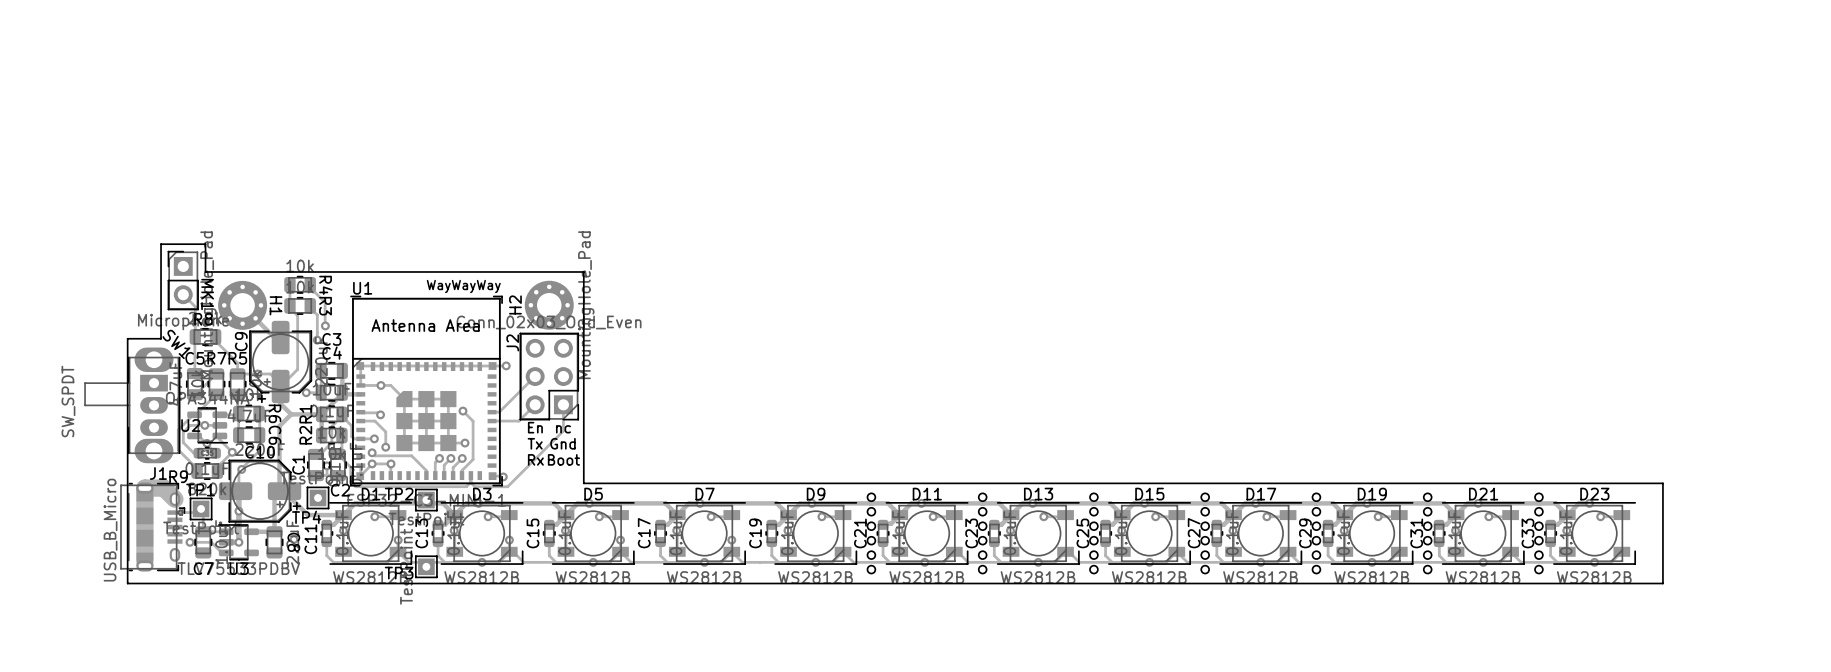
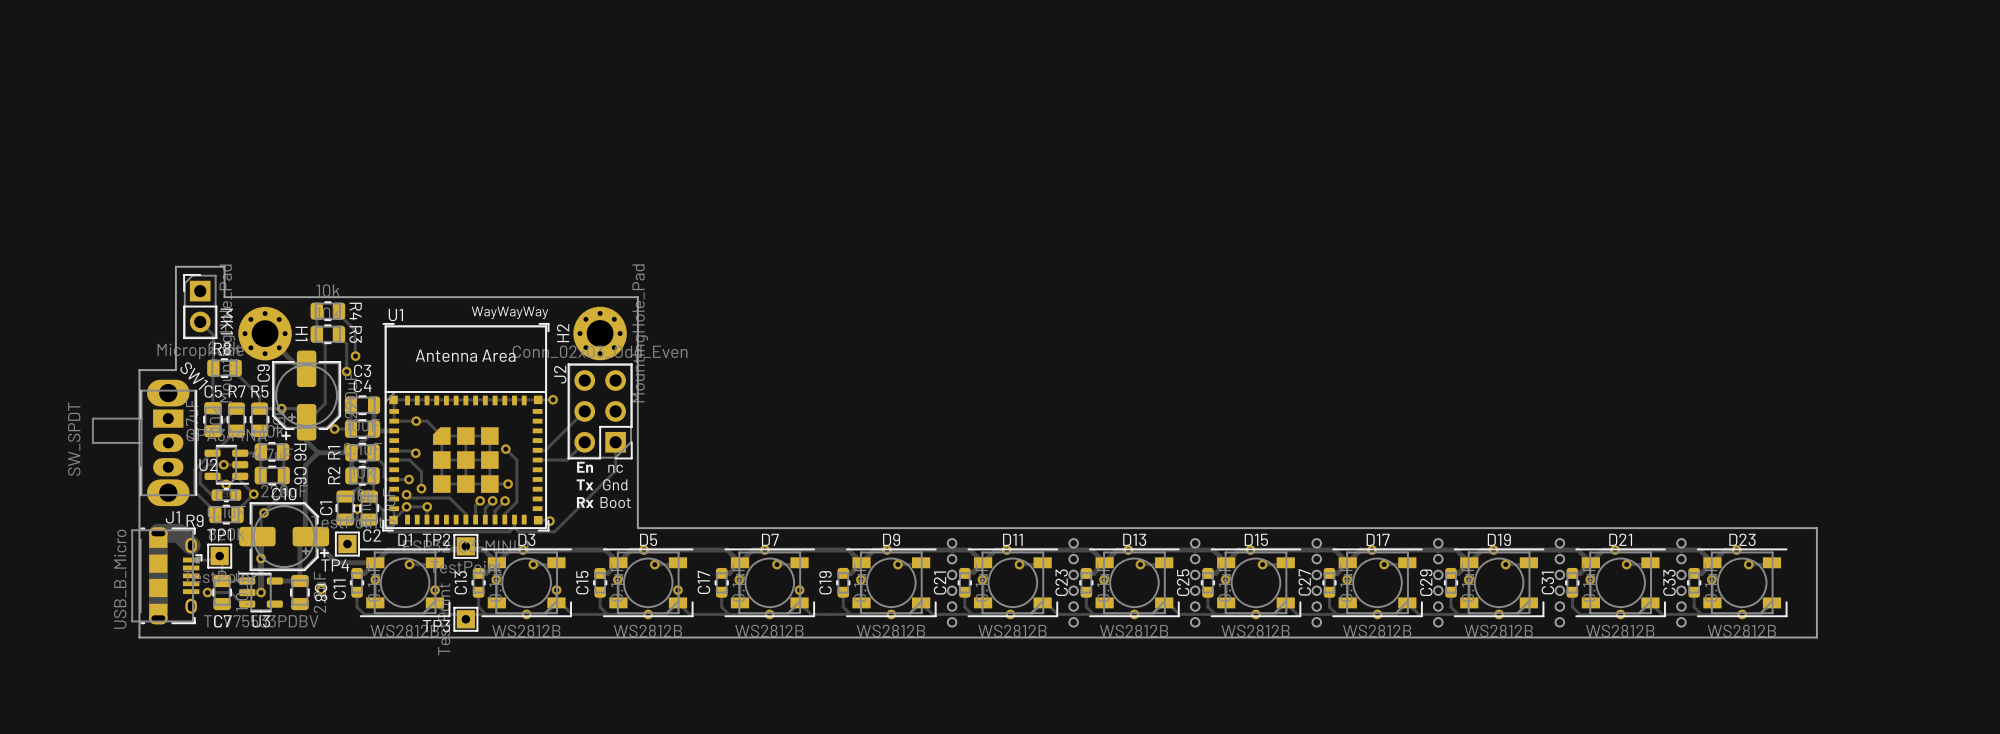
track: (1388, 562) (1446, 562) -> none

